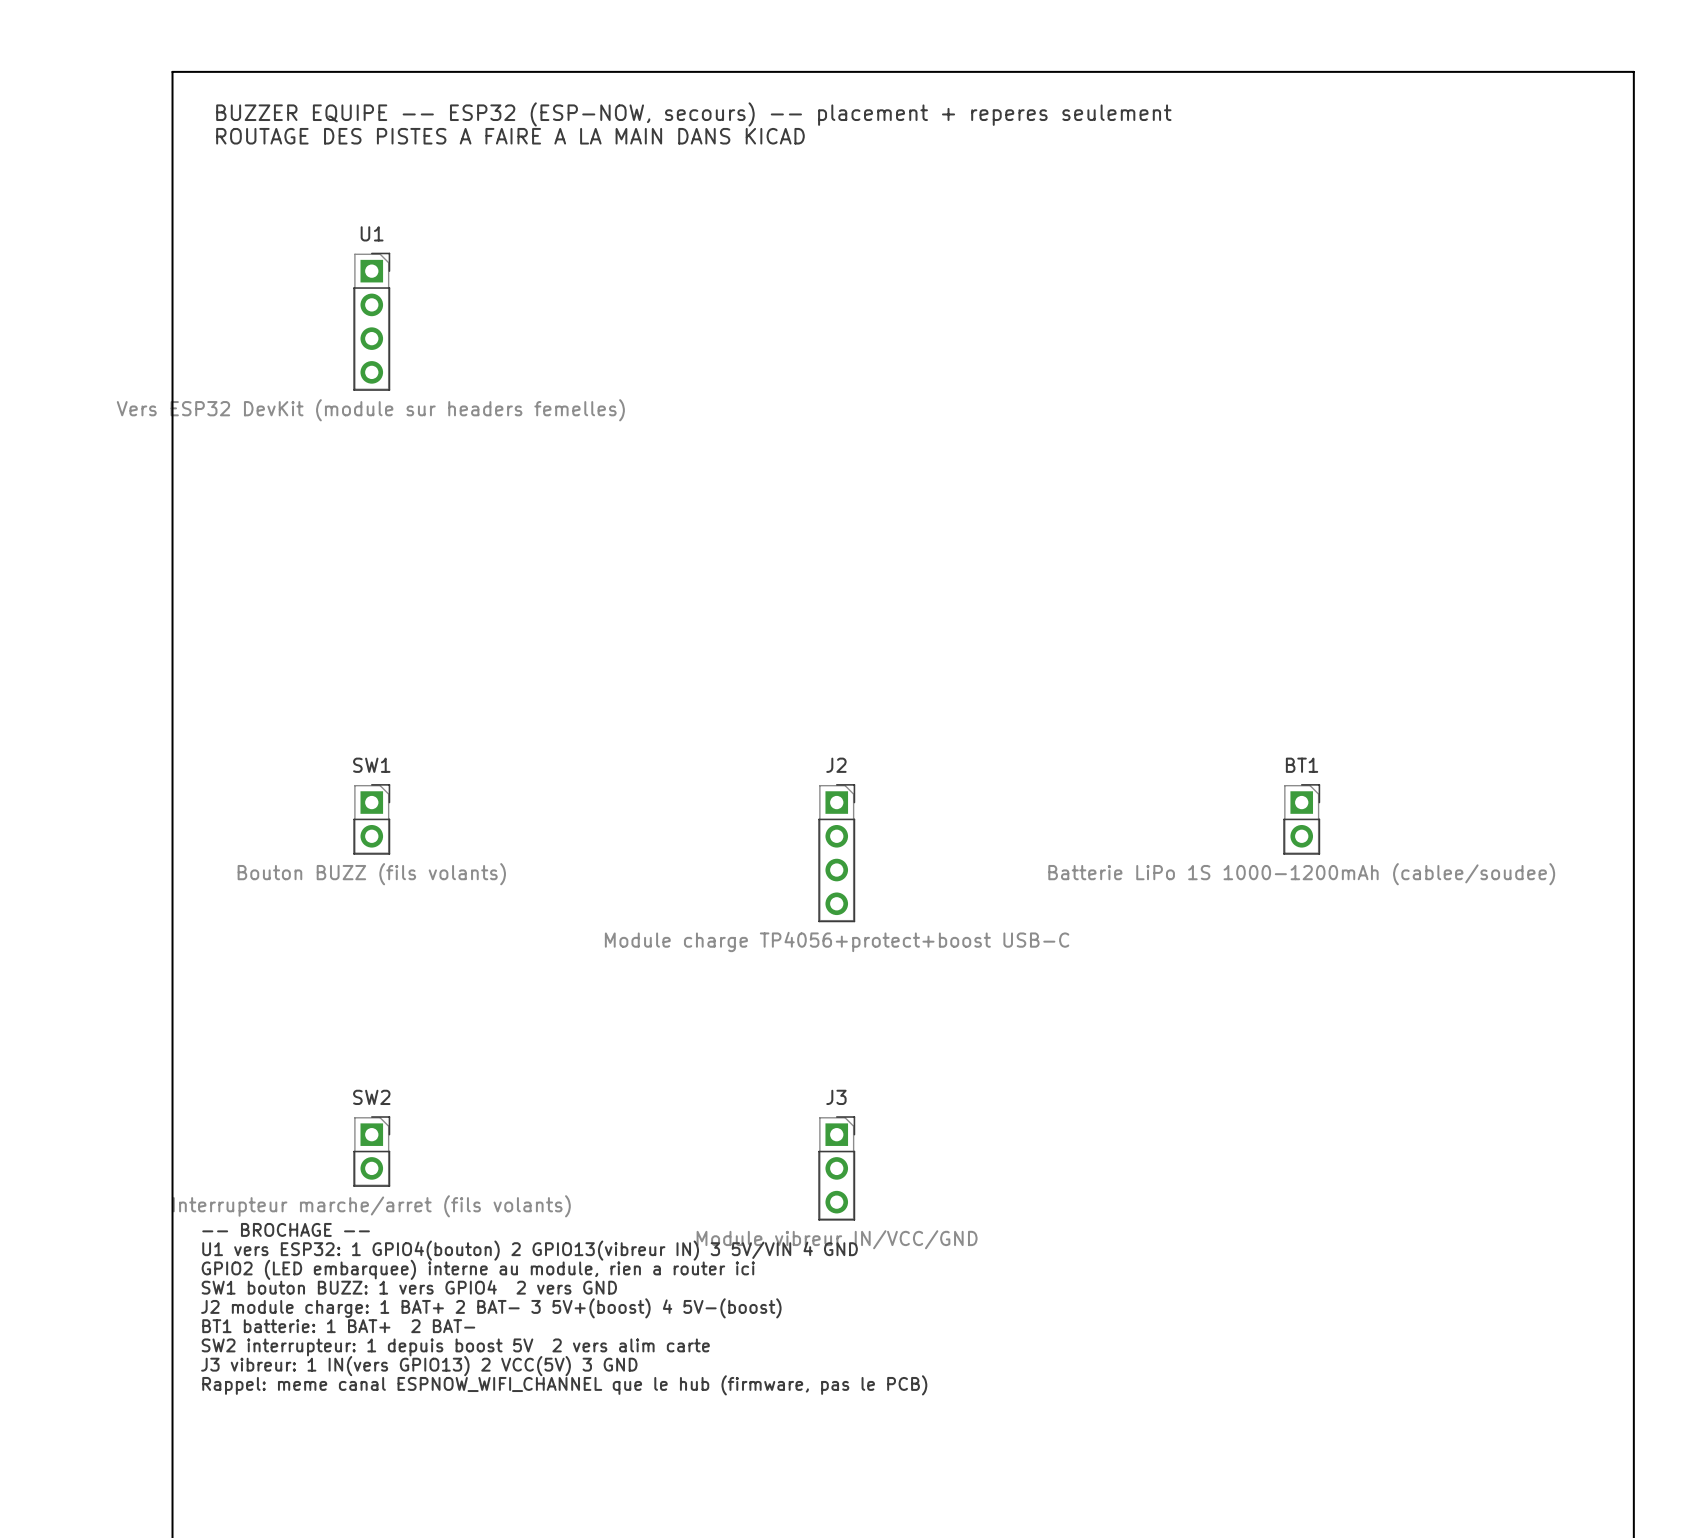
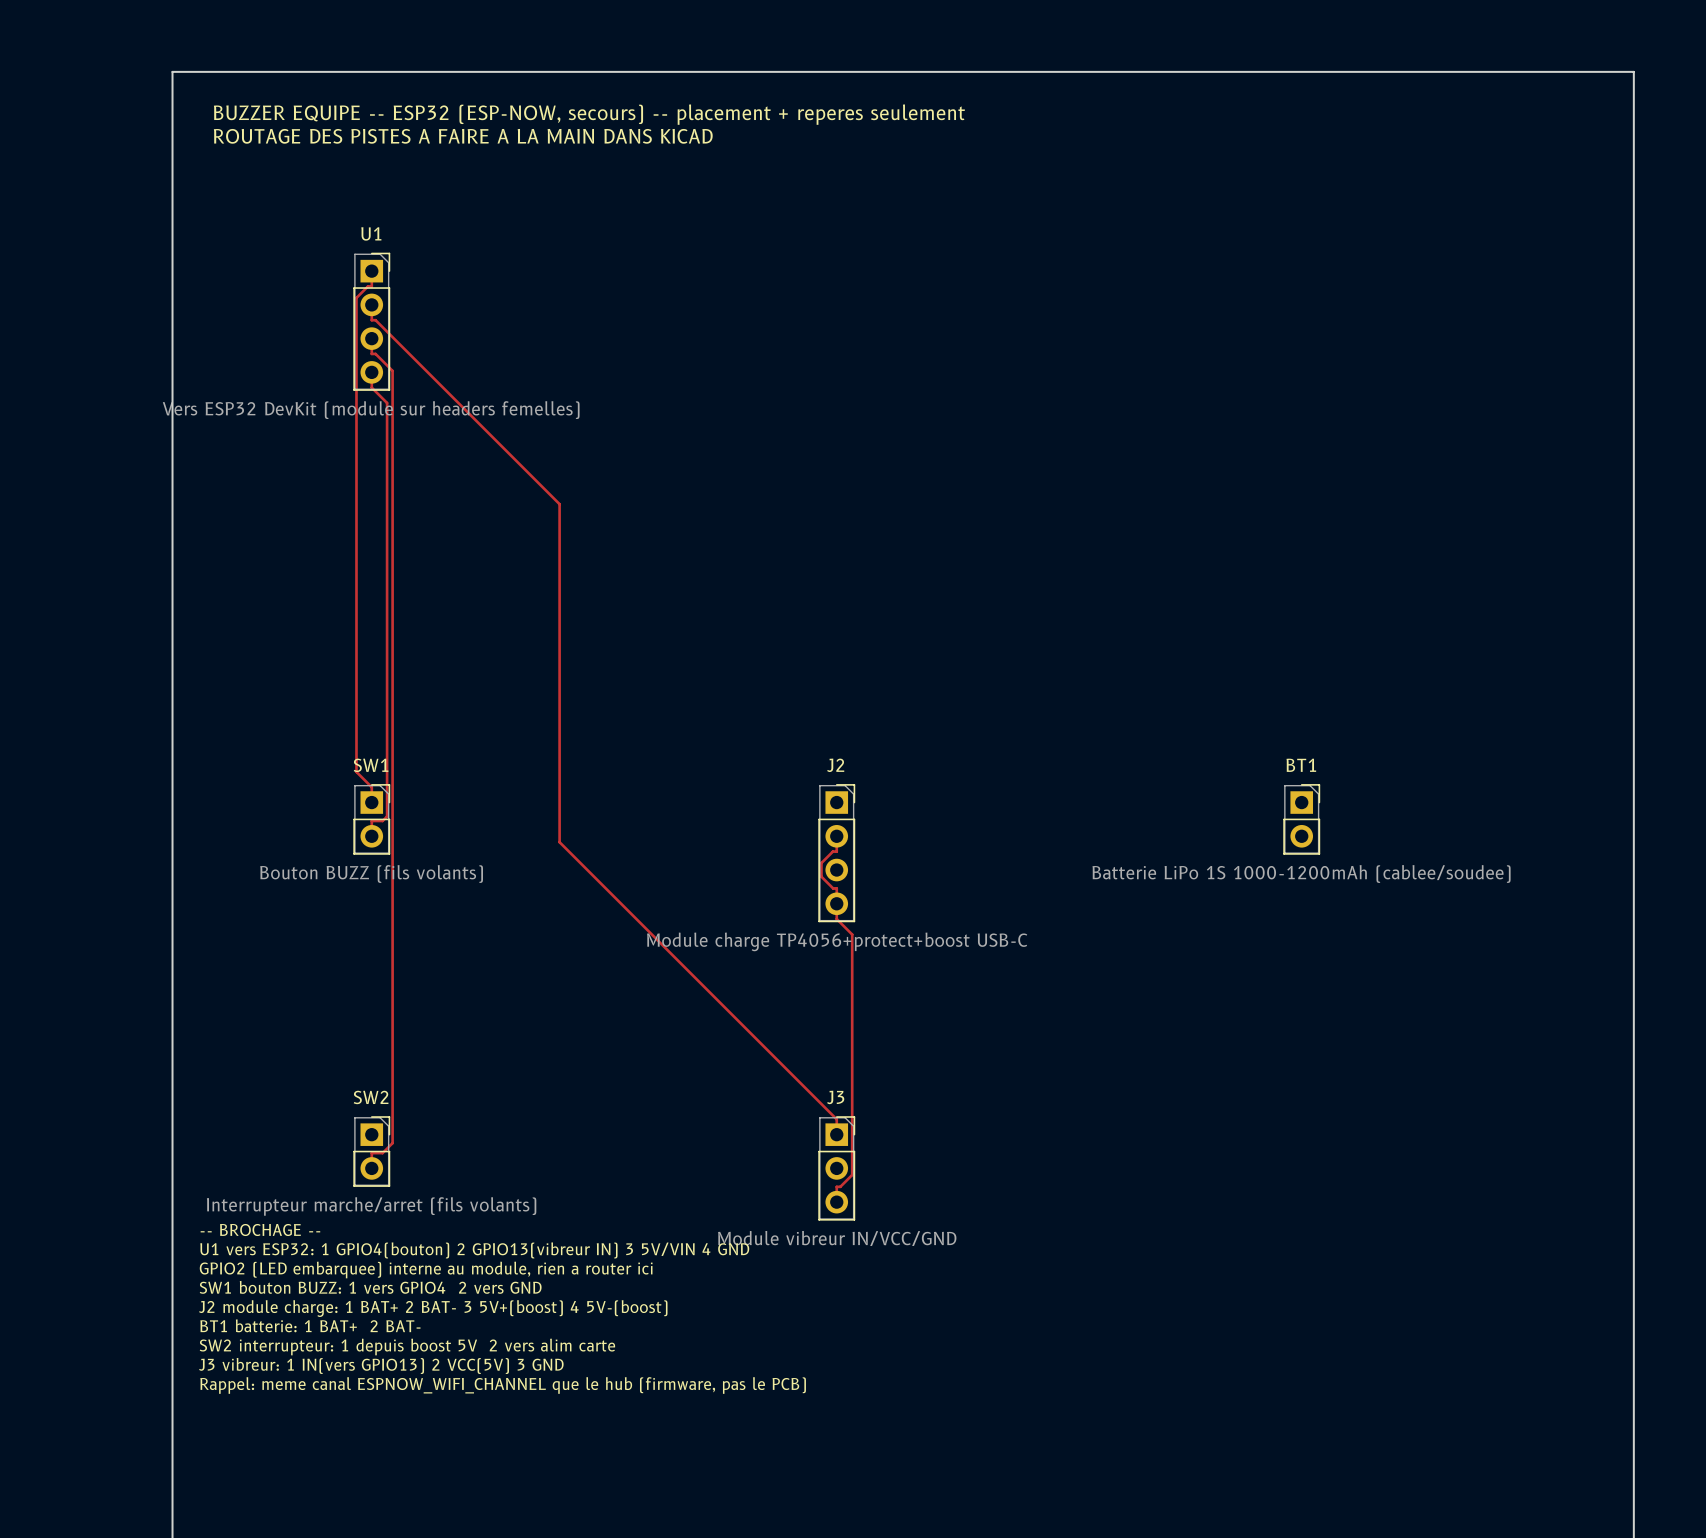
track: none -> (371, 271) (371, 286) (367, 286) (356, 297) (356, 771) (371, 787) (371, 802)
track: none -> (371, 304) (371, 320) (375, 320) (559, 504) (559, 842) (836, 1119) (836, 1134)
track: none -> (371, 338) (371, 353) (375, 353) (392, 370) (392, 1143) (382, 1153) (371, 1153) (371, 1168)
track: none -> (371, 372) (371, 387) (387, 402) (387, 816) (382, 820) (371, 820) (371, 836)
track: none -> (836, 836) (836, 851) (832, 851) (821, 863) (821, 876) (833, 888) (836, 888) (836, 919) (852, 934) (852, 1174) (840, 1186) (836, 1186) (836, 1202)

